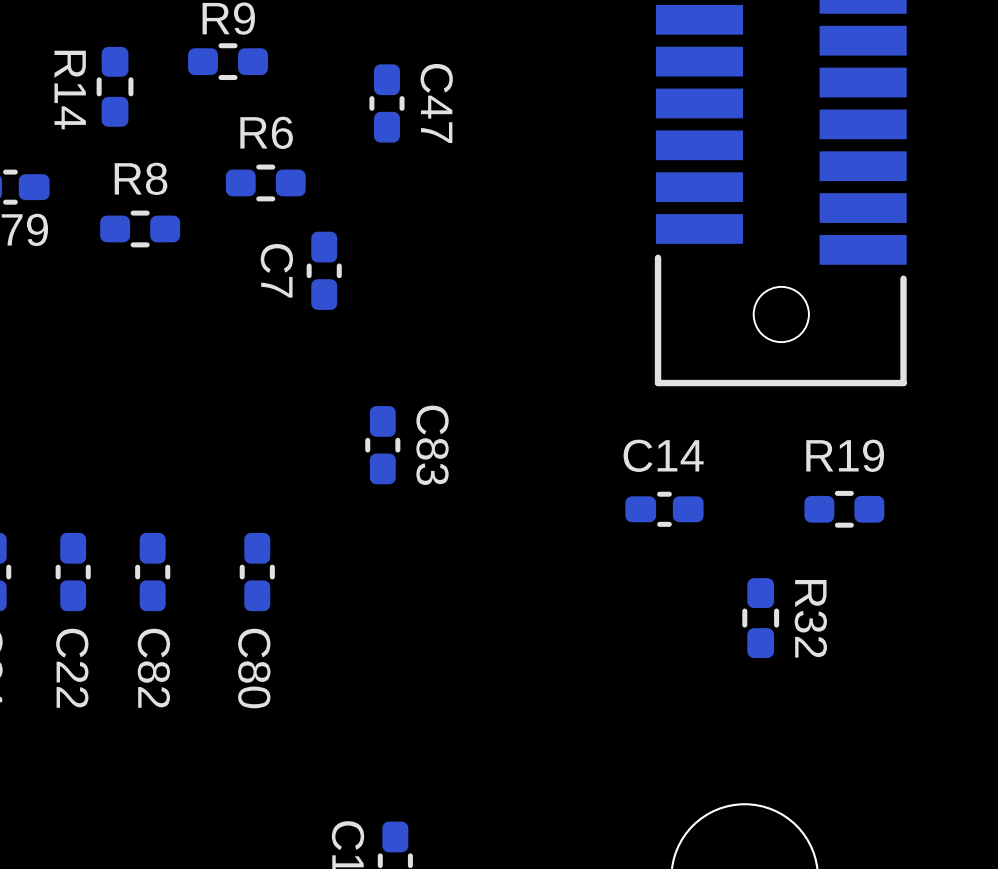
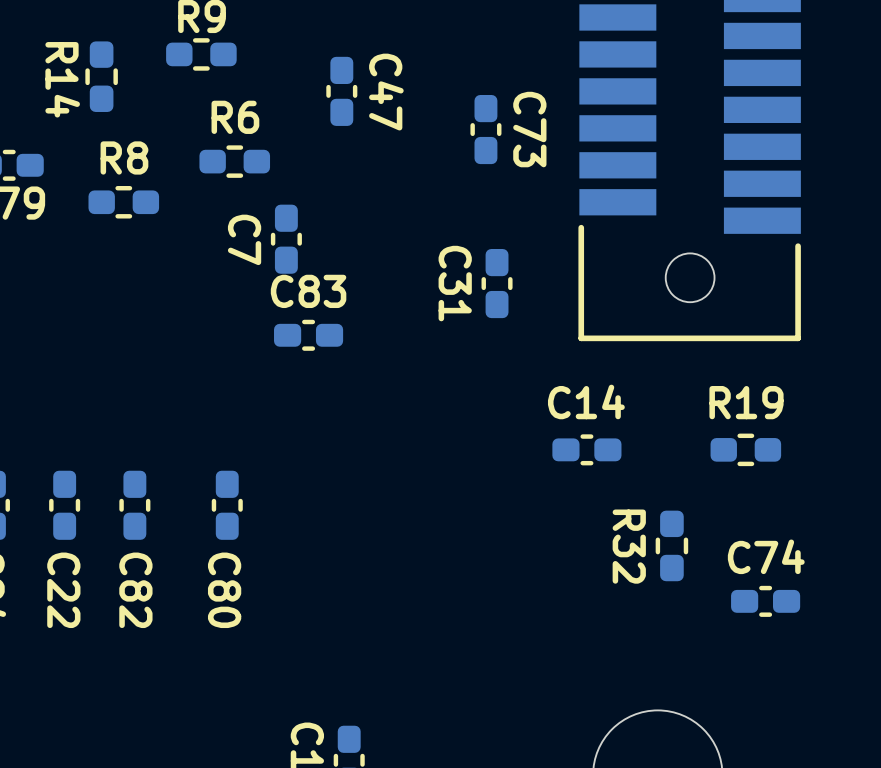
C73: none -> (485, 129)
C31: none -> (497, 283)
C83 rotation: 0° (382, 445) -> 90° clockwise (308, 335)
C83 position: (382, 445) -> (308, 335)
R32 name position: R32 (810, 618) -> R32 (629, 546)
C74: none -> (765, 601)

